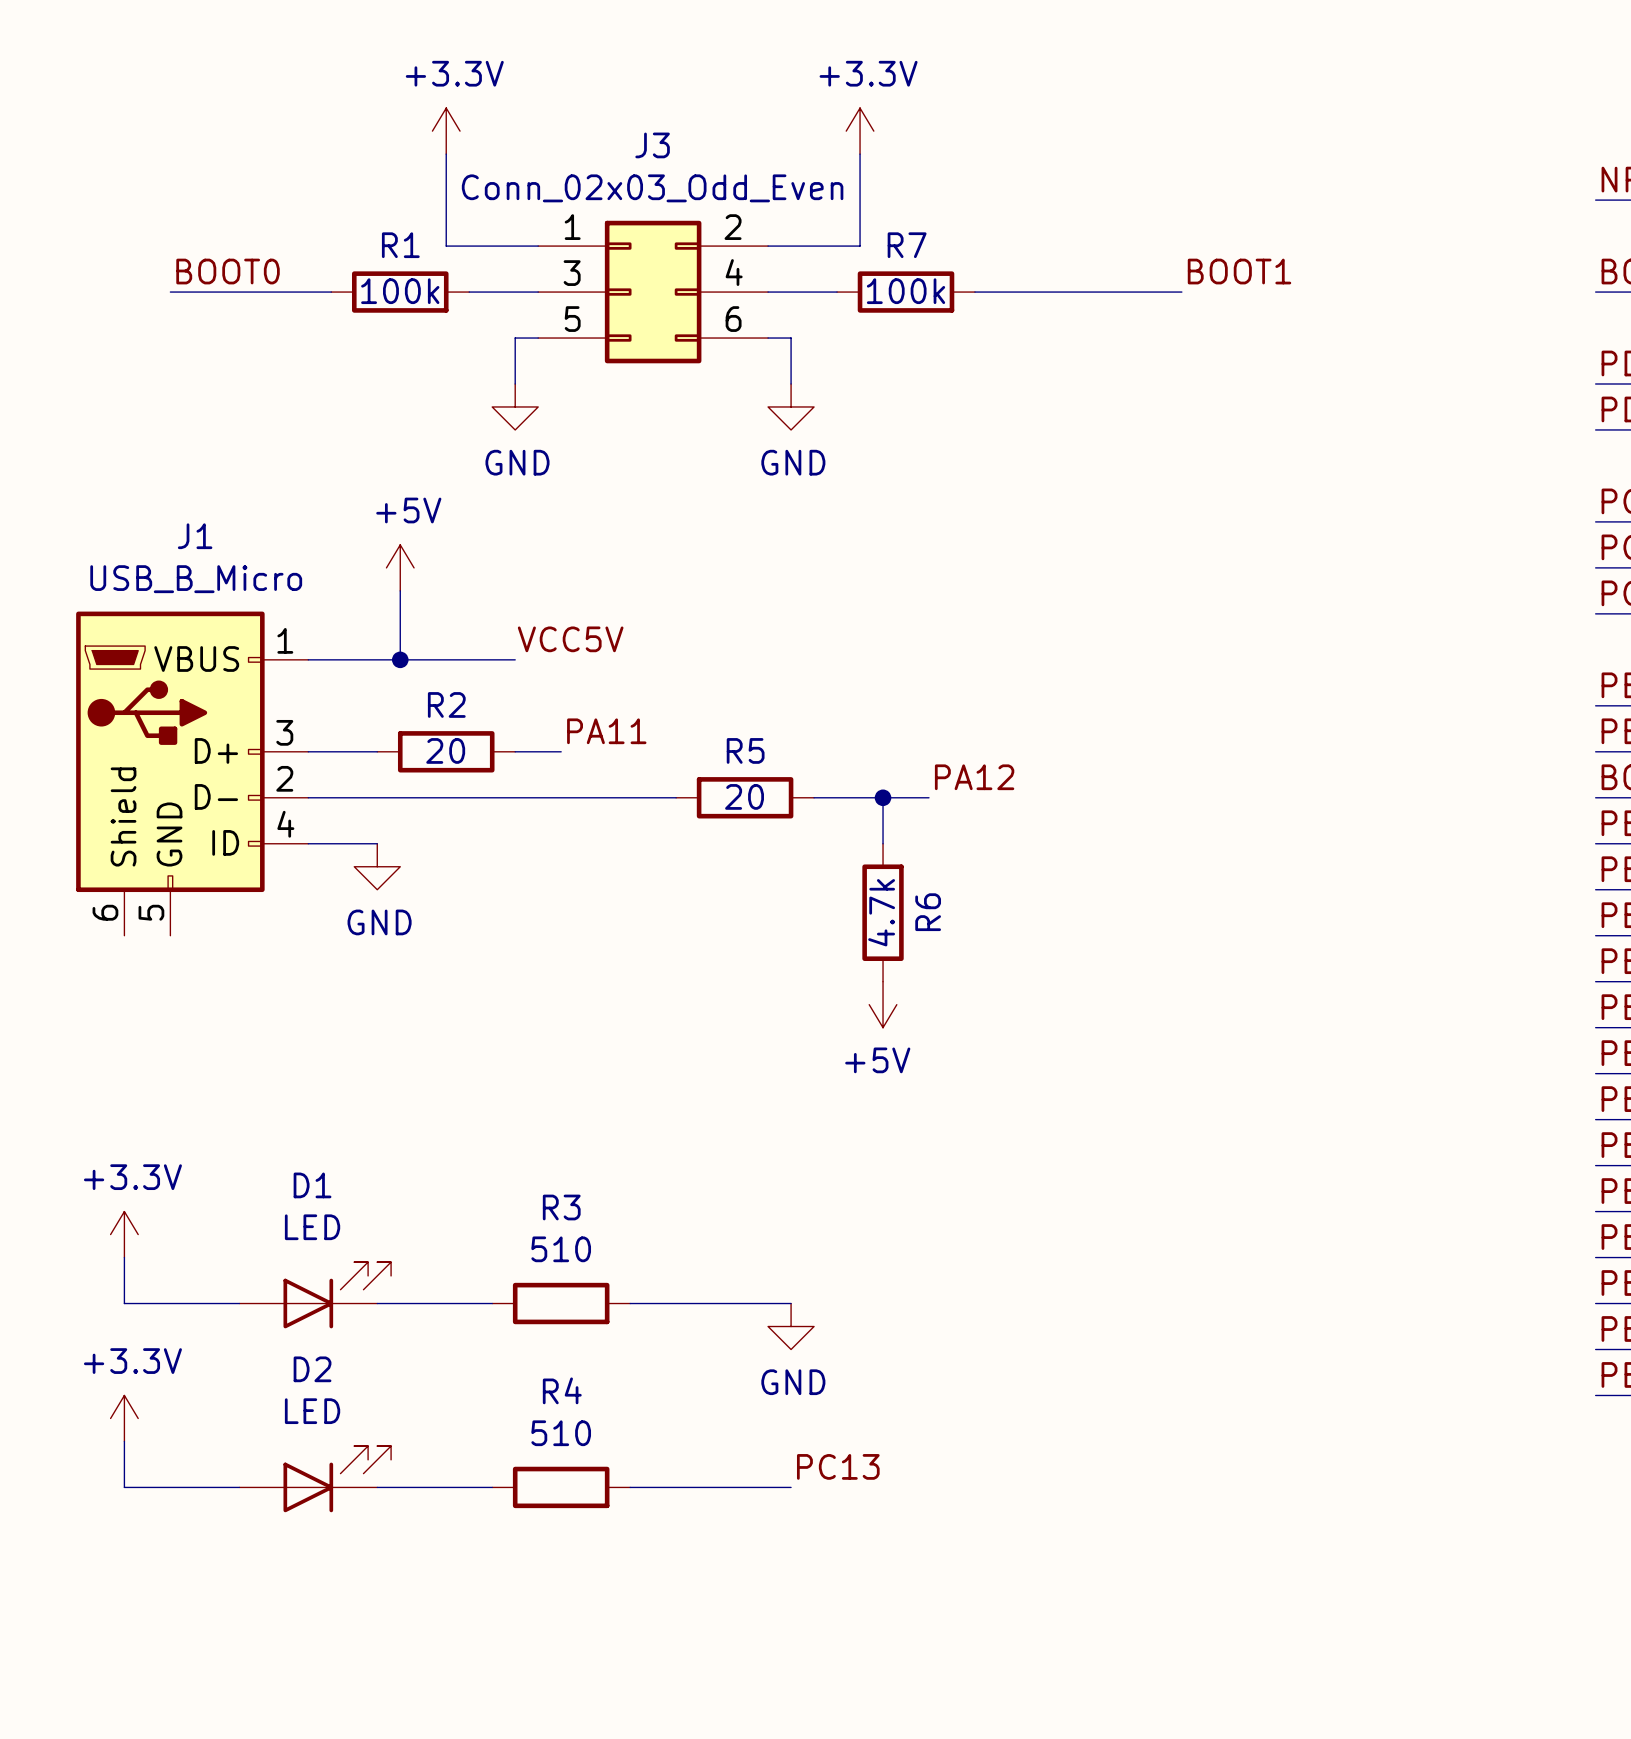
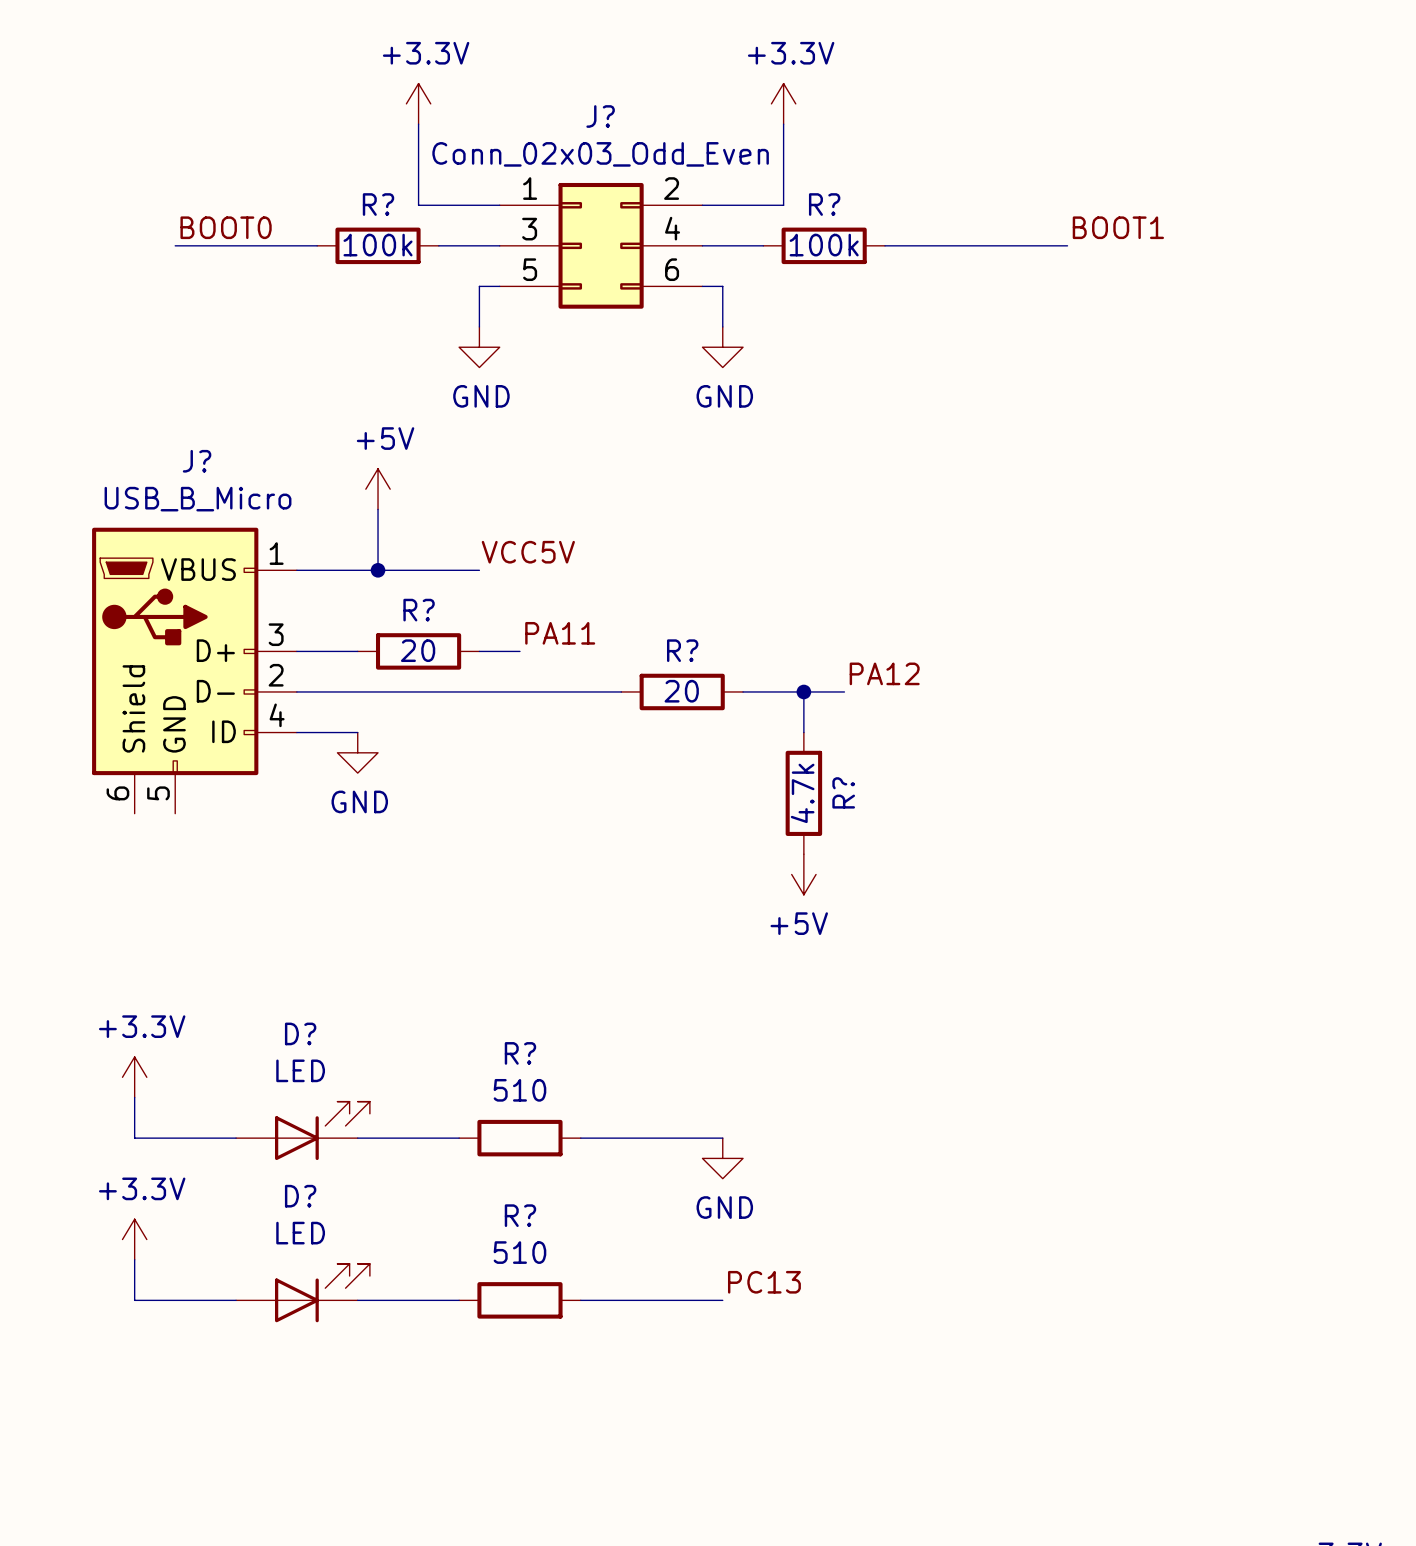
J3 name: J3 (652, 145) -> J? (600, 116)
R1 name: R1 (400, 245) -> R? (378, 204)
R7 name: R7 (907, 245) -> R? (824, 204)
J1 name: J1 (195, 536) -> J? (197, 461)
R2 name: R2 (446, 704) -> R? (419, 610)
R5 name: R5 (745, 750) -> R? (682, 650)
R6 name: R6 (928, 912) -> R? (843, 792)
D1 name: D1 (312, 1185) -> D? (300, 1033)
R3 name: R3 (561, 1207) -> R? (520, 1053)
D2 name: D2 (312, 1369) -> D? (300, 1196)
R4 name: R4 (562, 1390) -> R? (520, 1215)

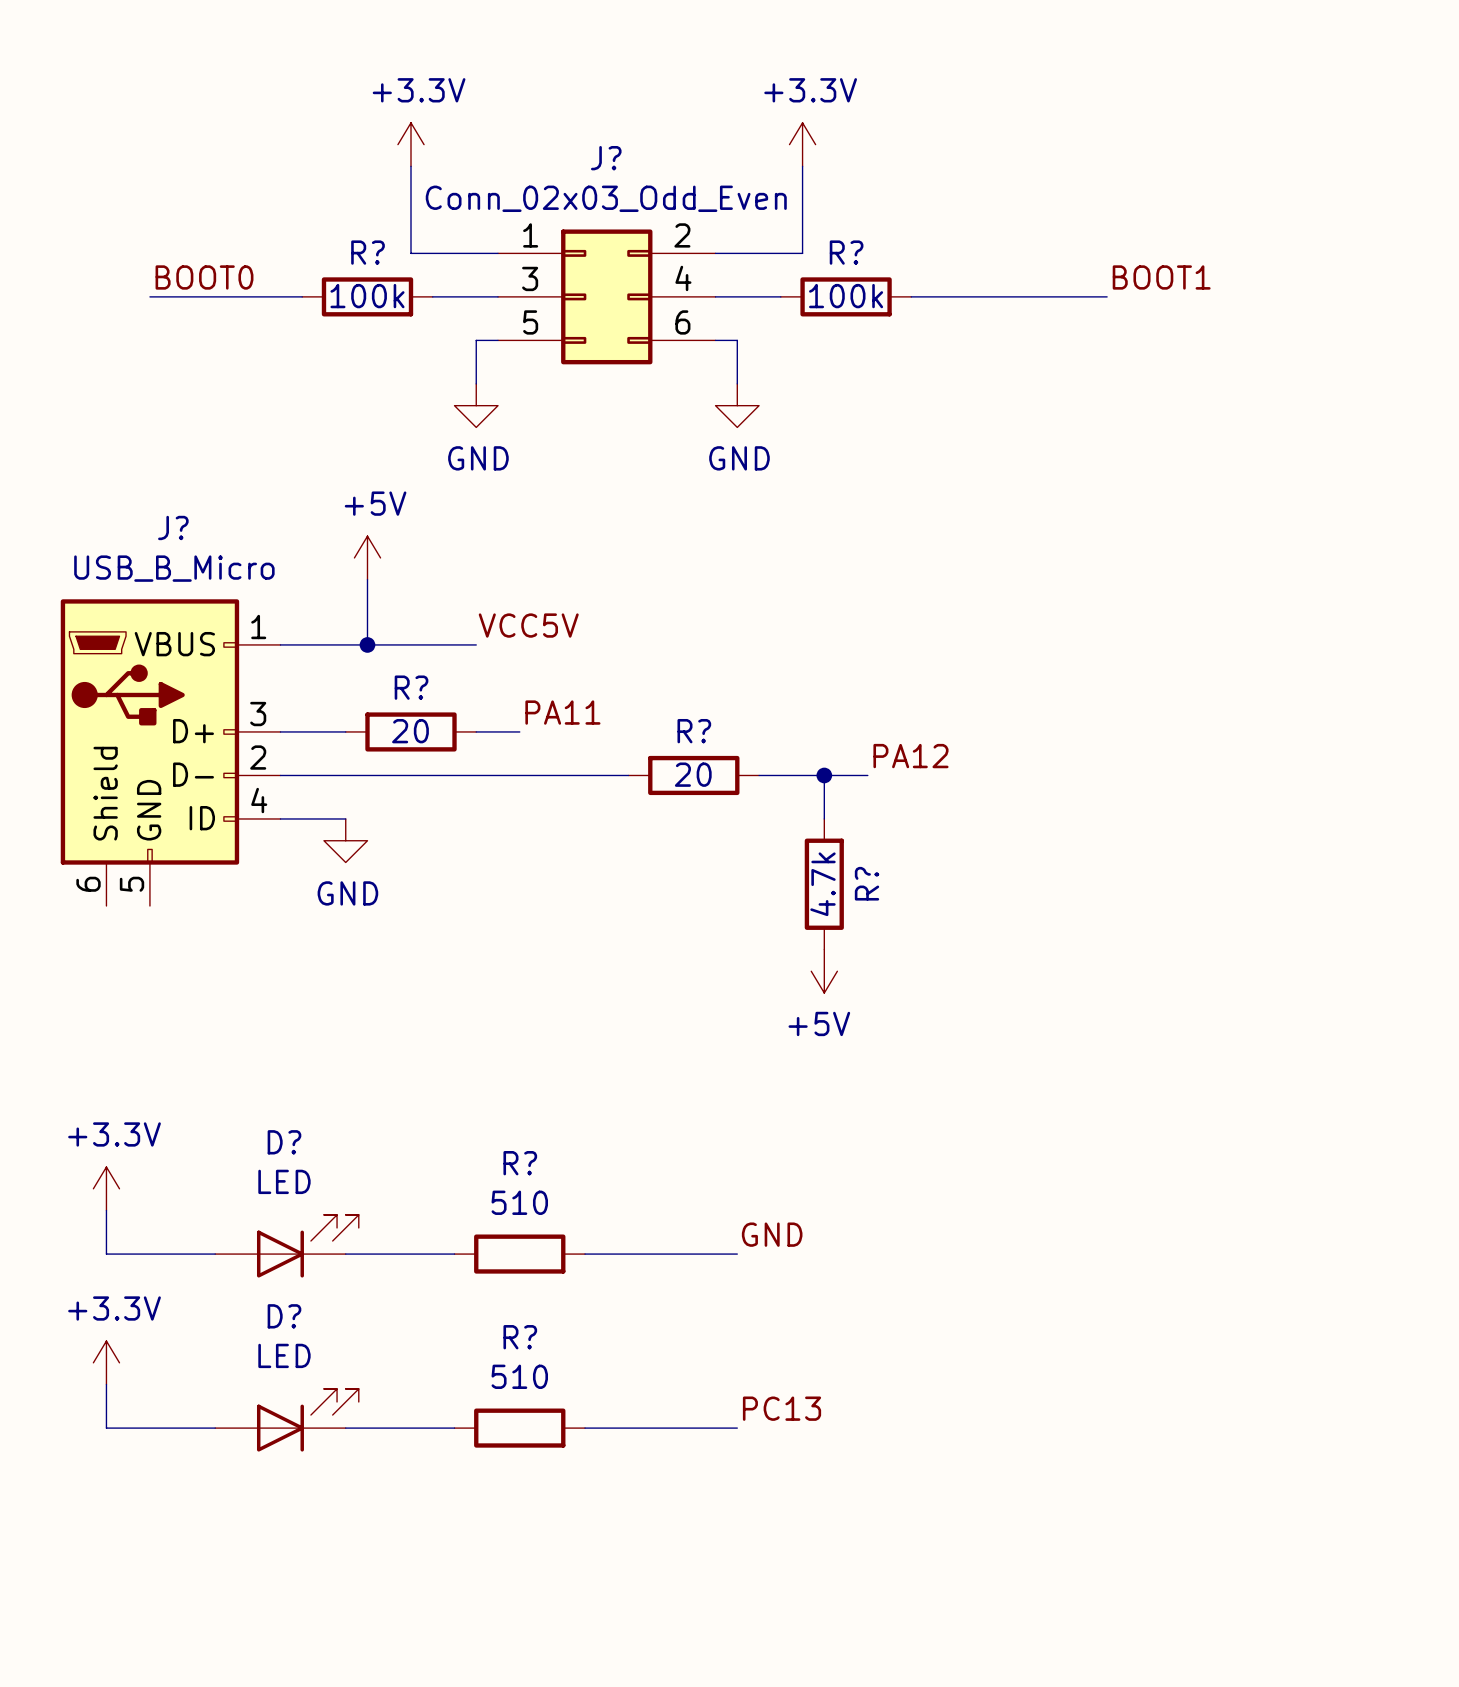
label: none -> GND (772, 1234)
power symbol: GND (722, 1158) -> none

